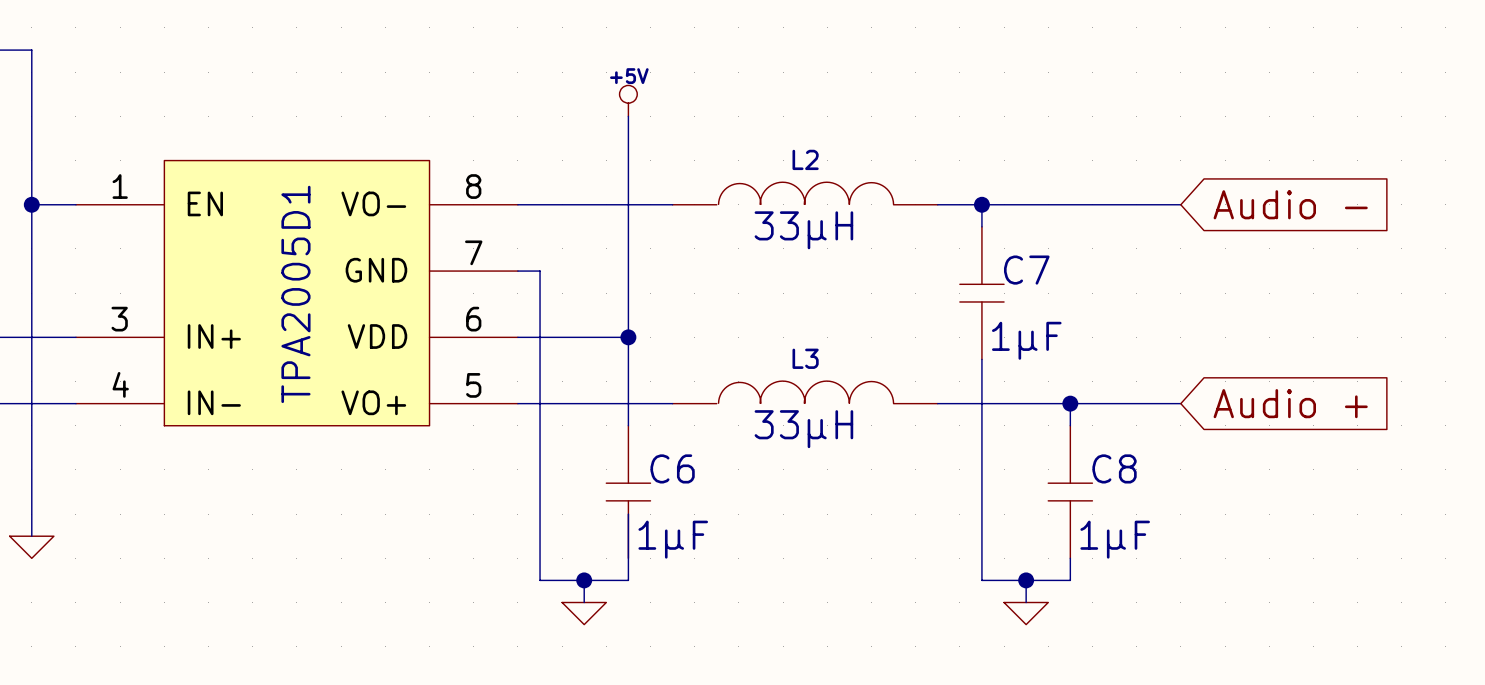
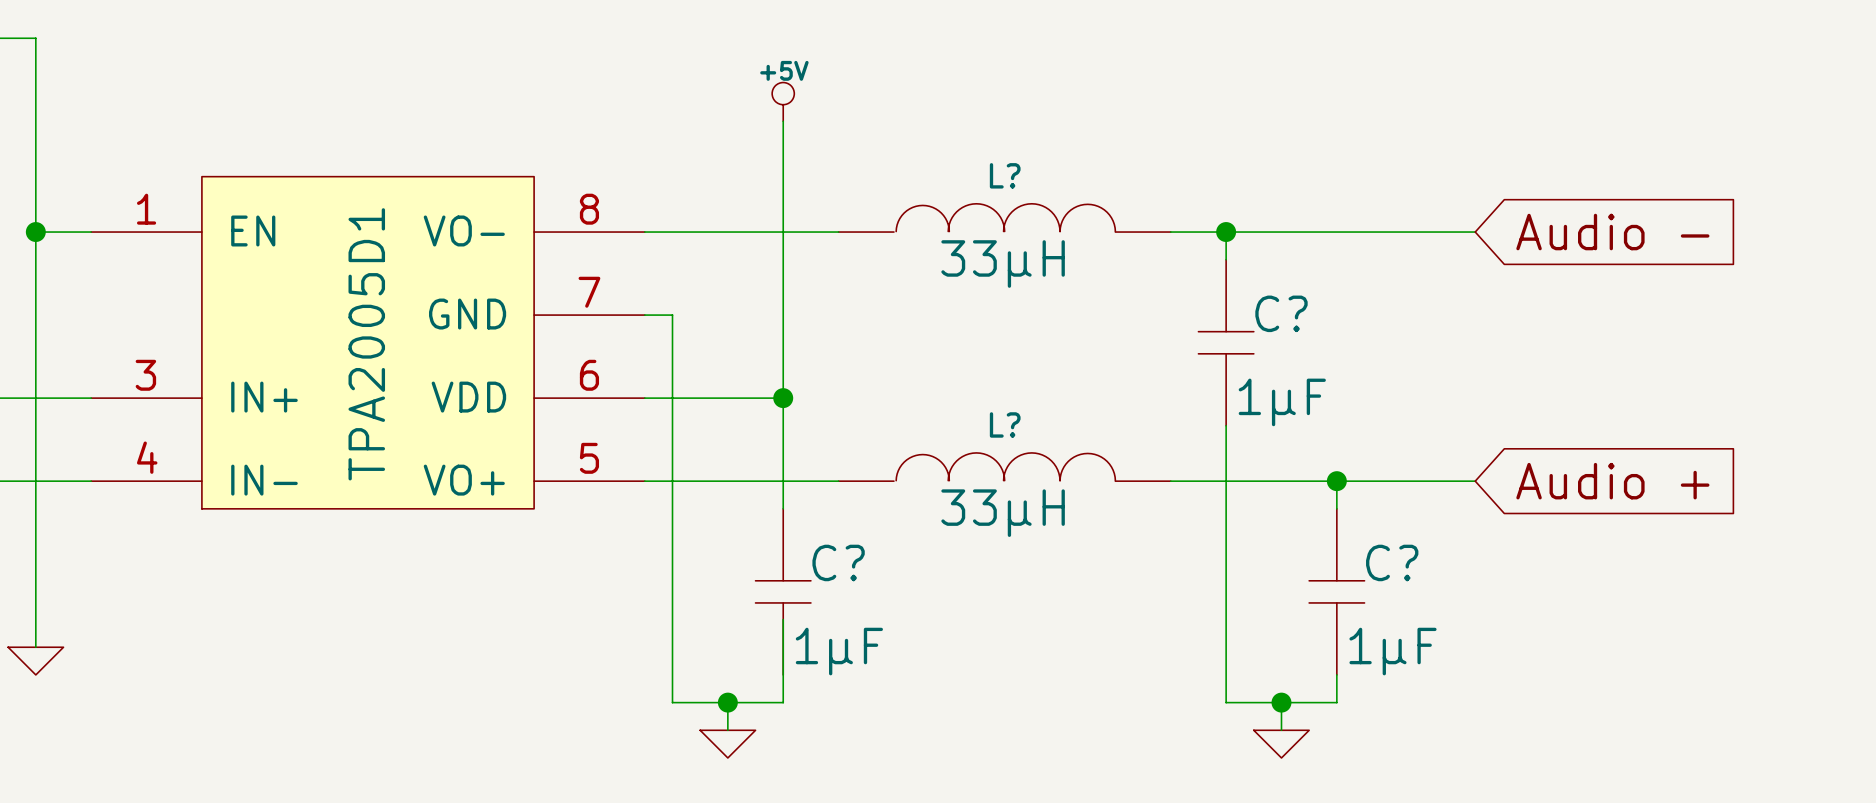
L2 name: L2 (805, 159) -> L? (1005, 175)
C7 name: C7 (1026, 270) -> C? (1281, 313)
L3 name: L3 (805, 358) -> L? (1005, 424)
C6 name: C6 (672, 468) -> C? (838, 562)
C8 name: C8 (1114, 468) -> C? (1392, 562)

